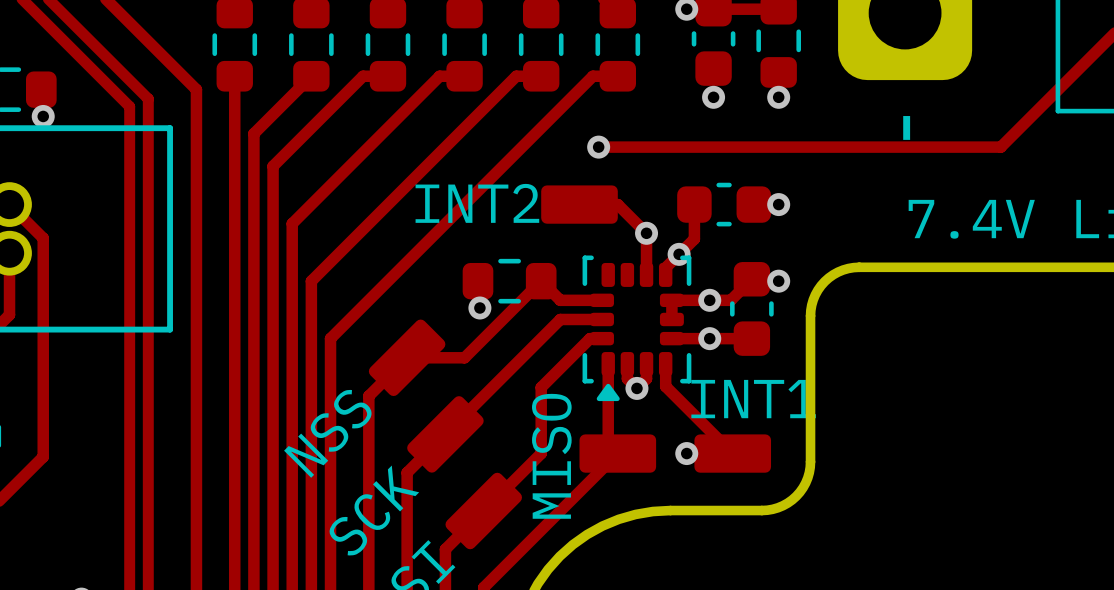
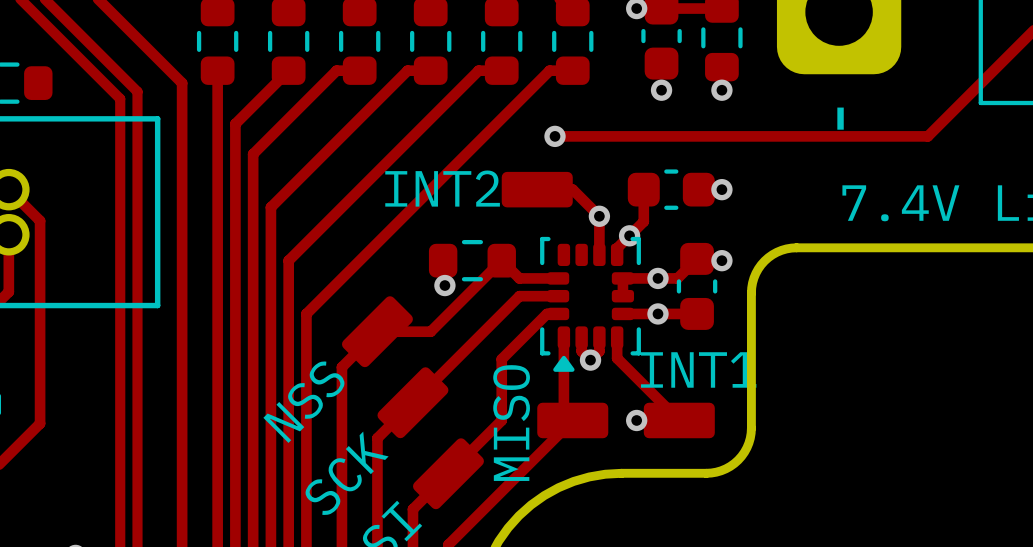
via: (43, 116) -> none

